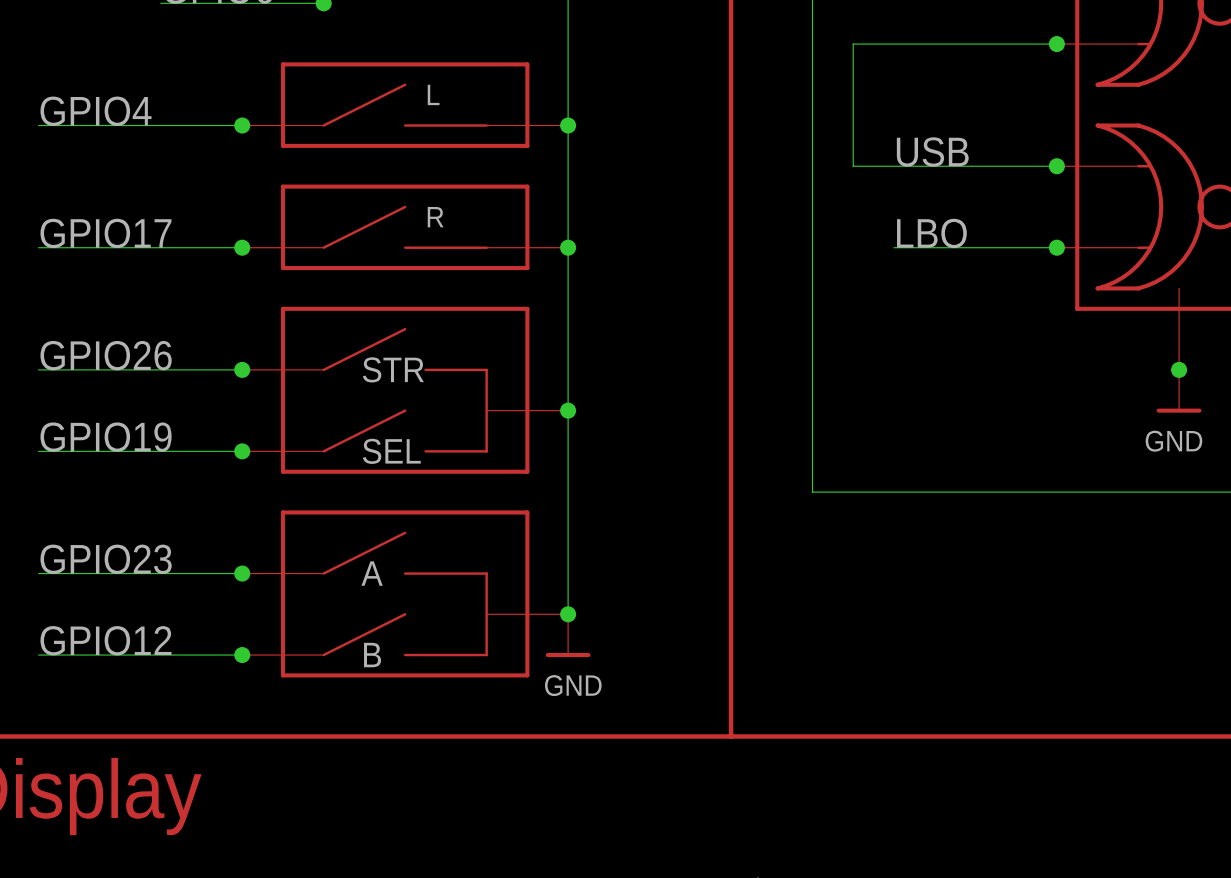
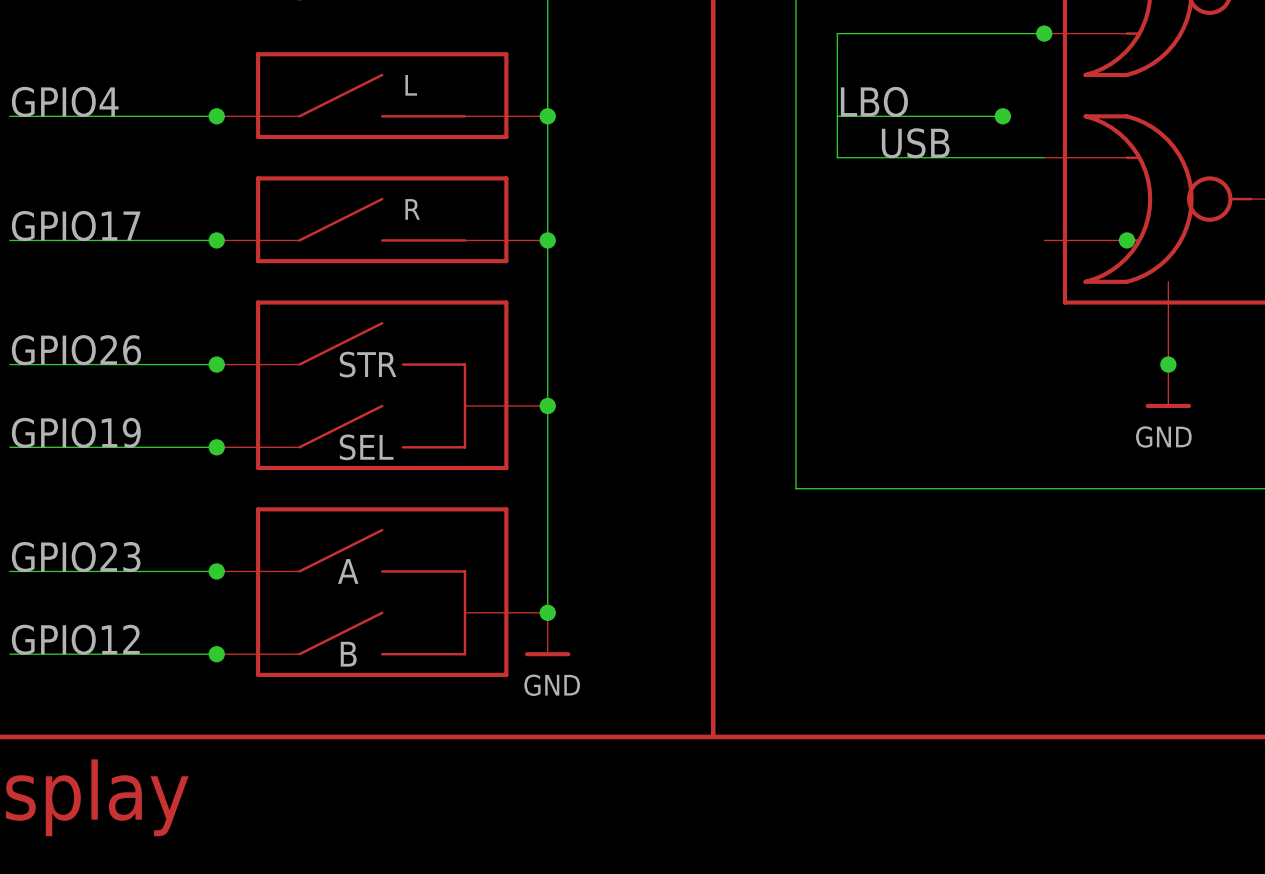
junction: none -> (1002, 116)
junction: (1056, 166) -> none
label position: LBO (931, 233) -> LBO (874, 101)
wire: (893, 247) (1056, 247) -> (837, 116) (1002, 116)
junction: (1056, 247) -> none
junction: none -> (1126, 240)

